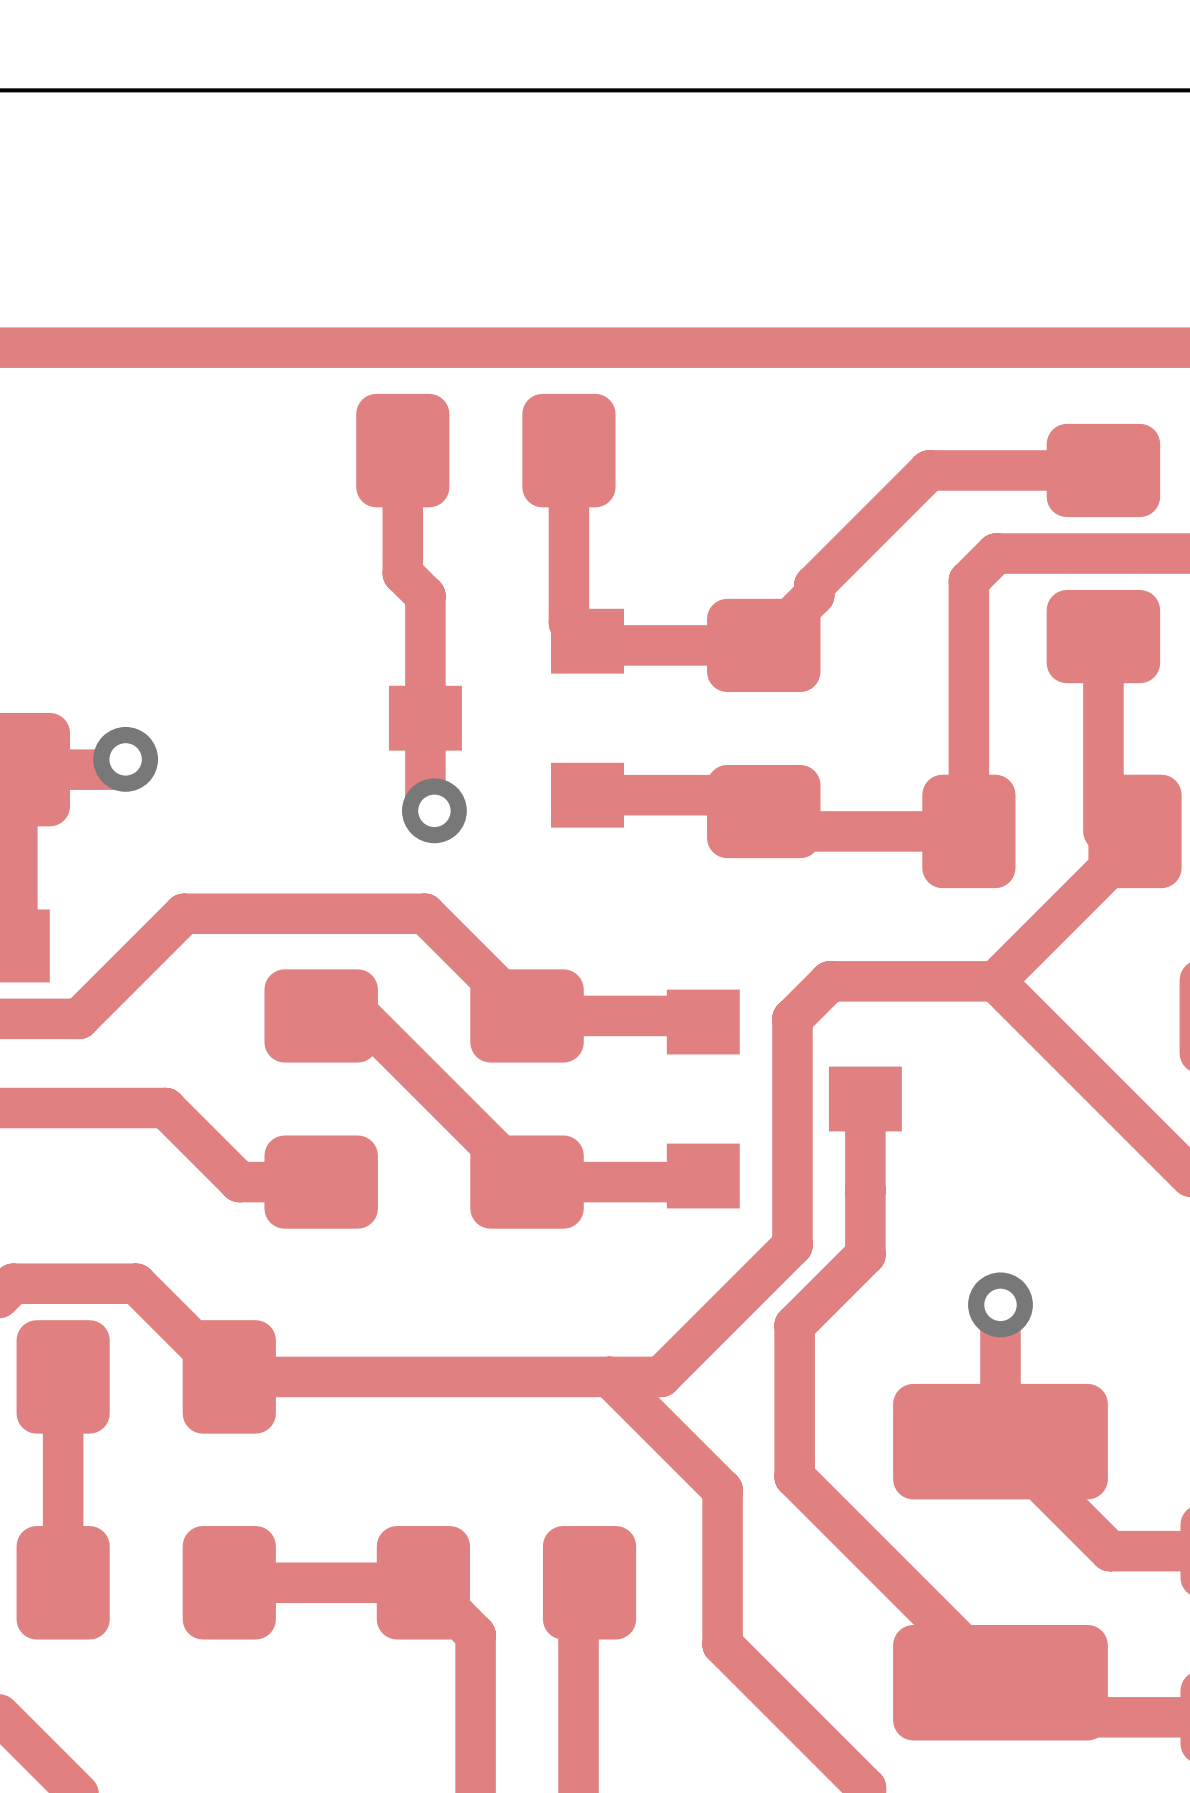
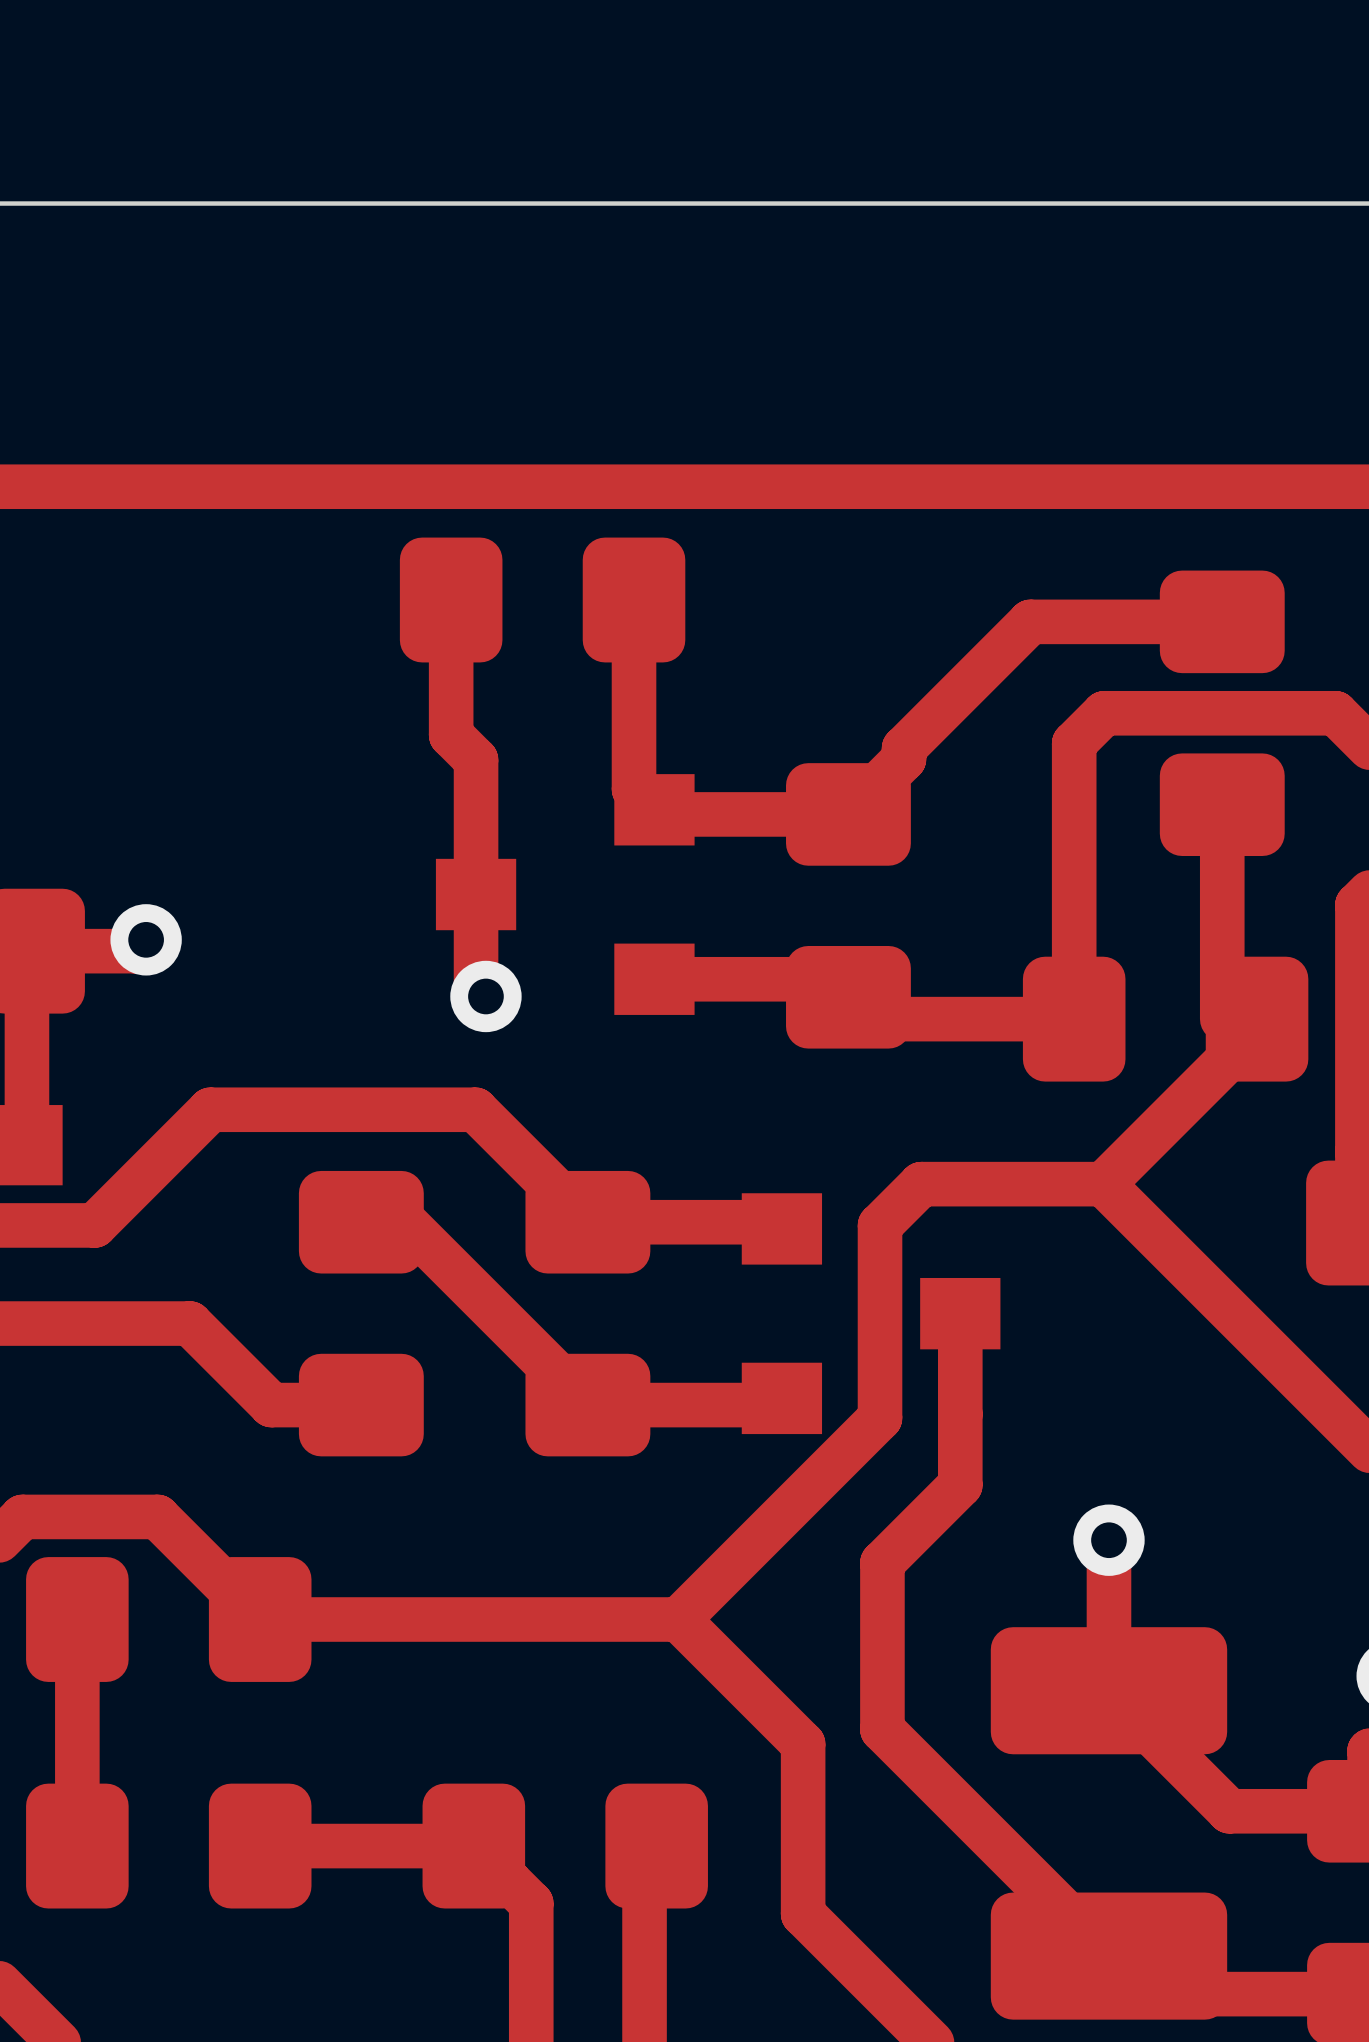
top track: (792, 1193) (792, 1245) (660, 1376) (609, 1376) -> (880, 1418) (678, 1619)

